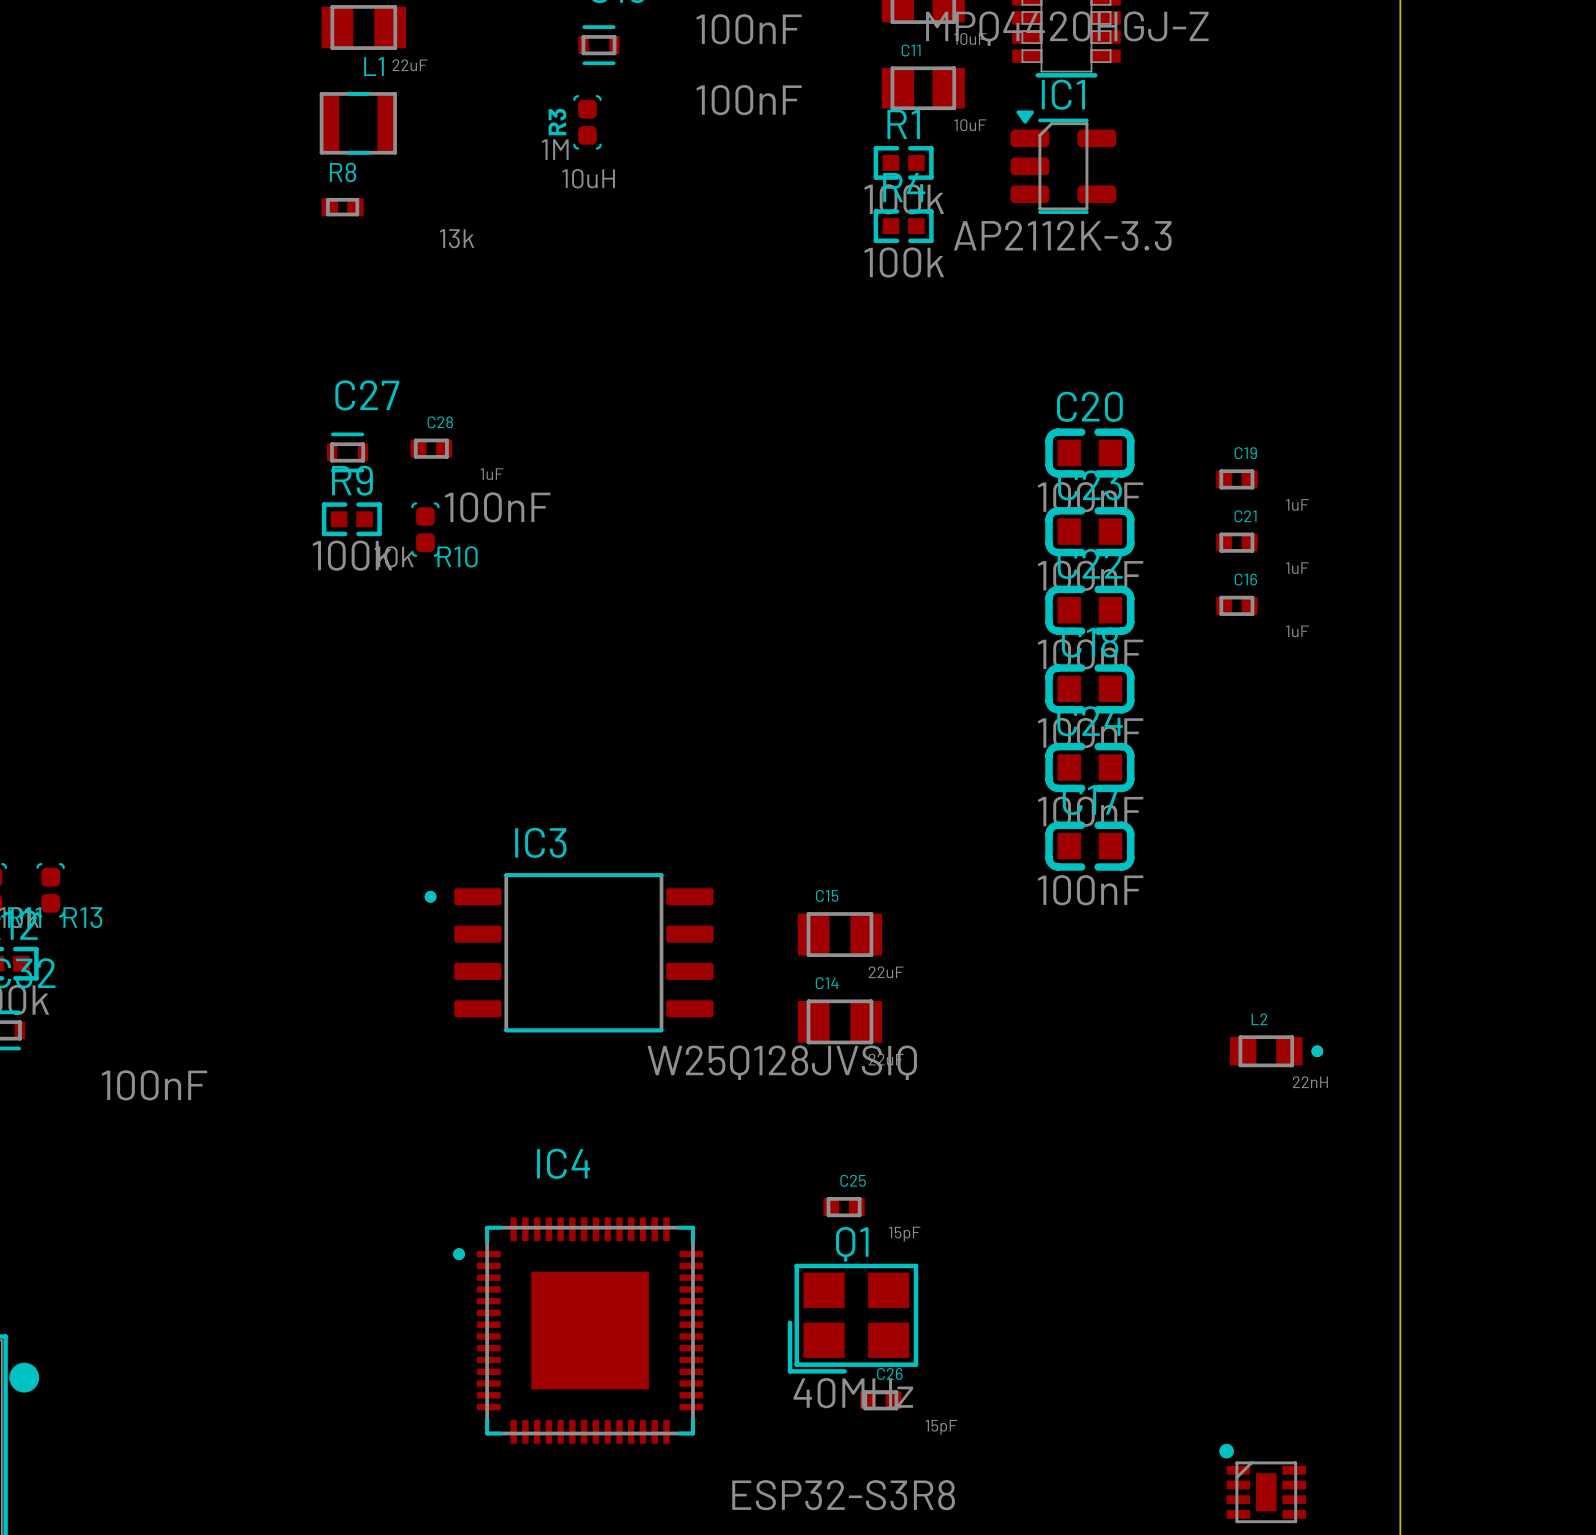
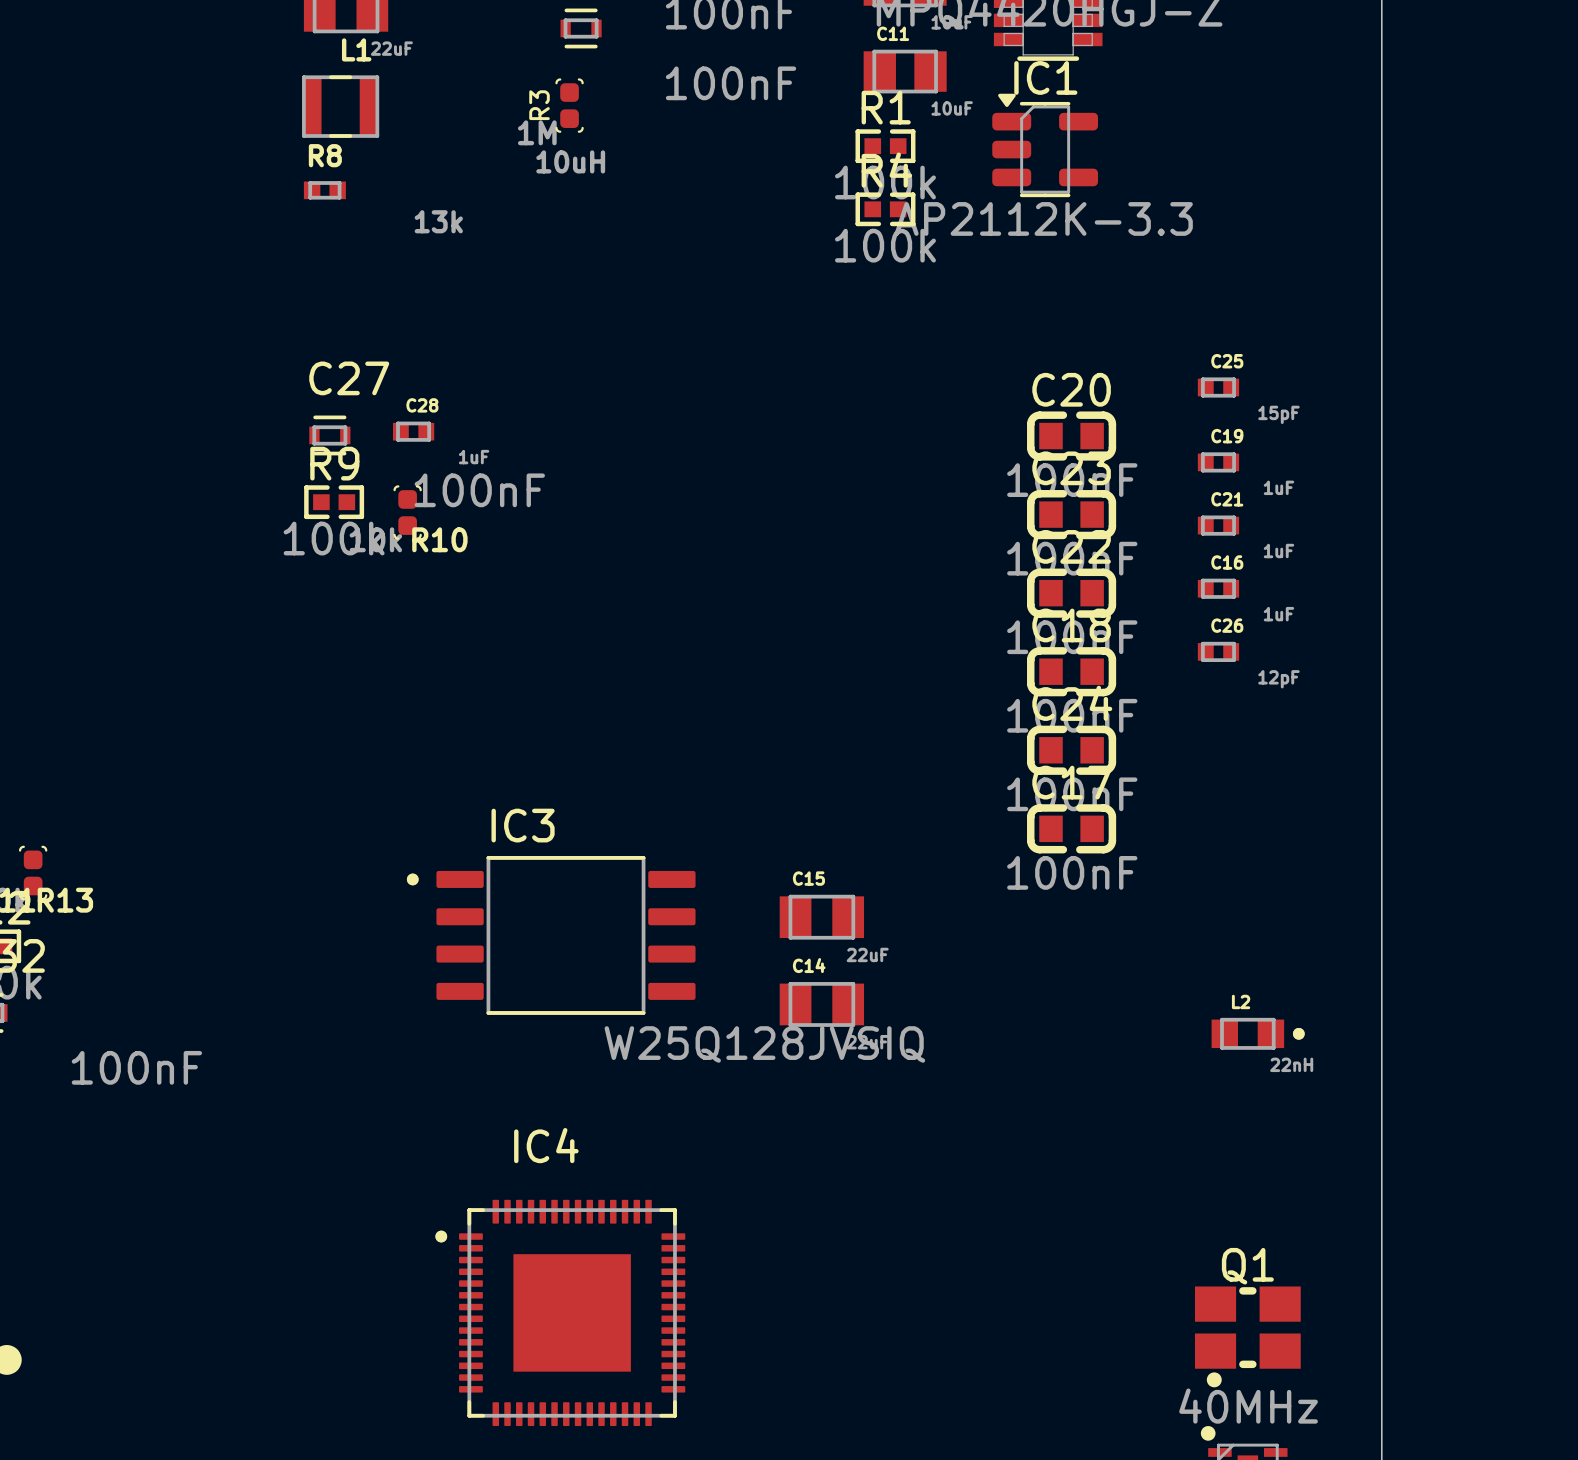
C25 position: (844, 1207) -> (1218, 387)
Q1 footprint: [787, 1263, 919, 1374] -> [1194, 1286, 1301, 1388]
C26 position: (880, 1400) -> (1218, 651)
C26 value: 15pF (941, 1427) -> 12pF (1278, 679)

